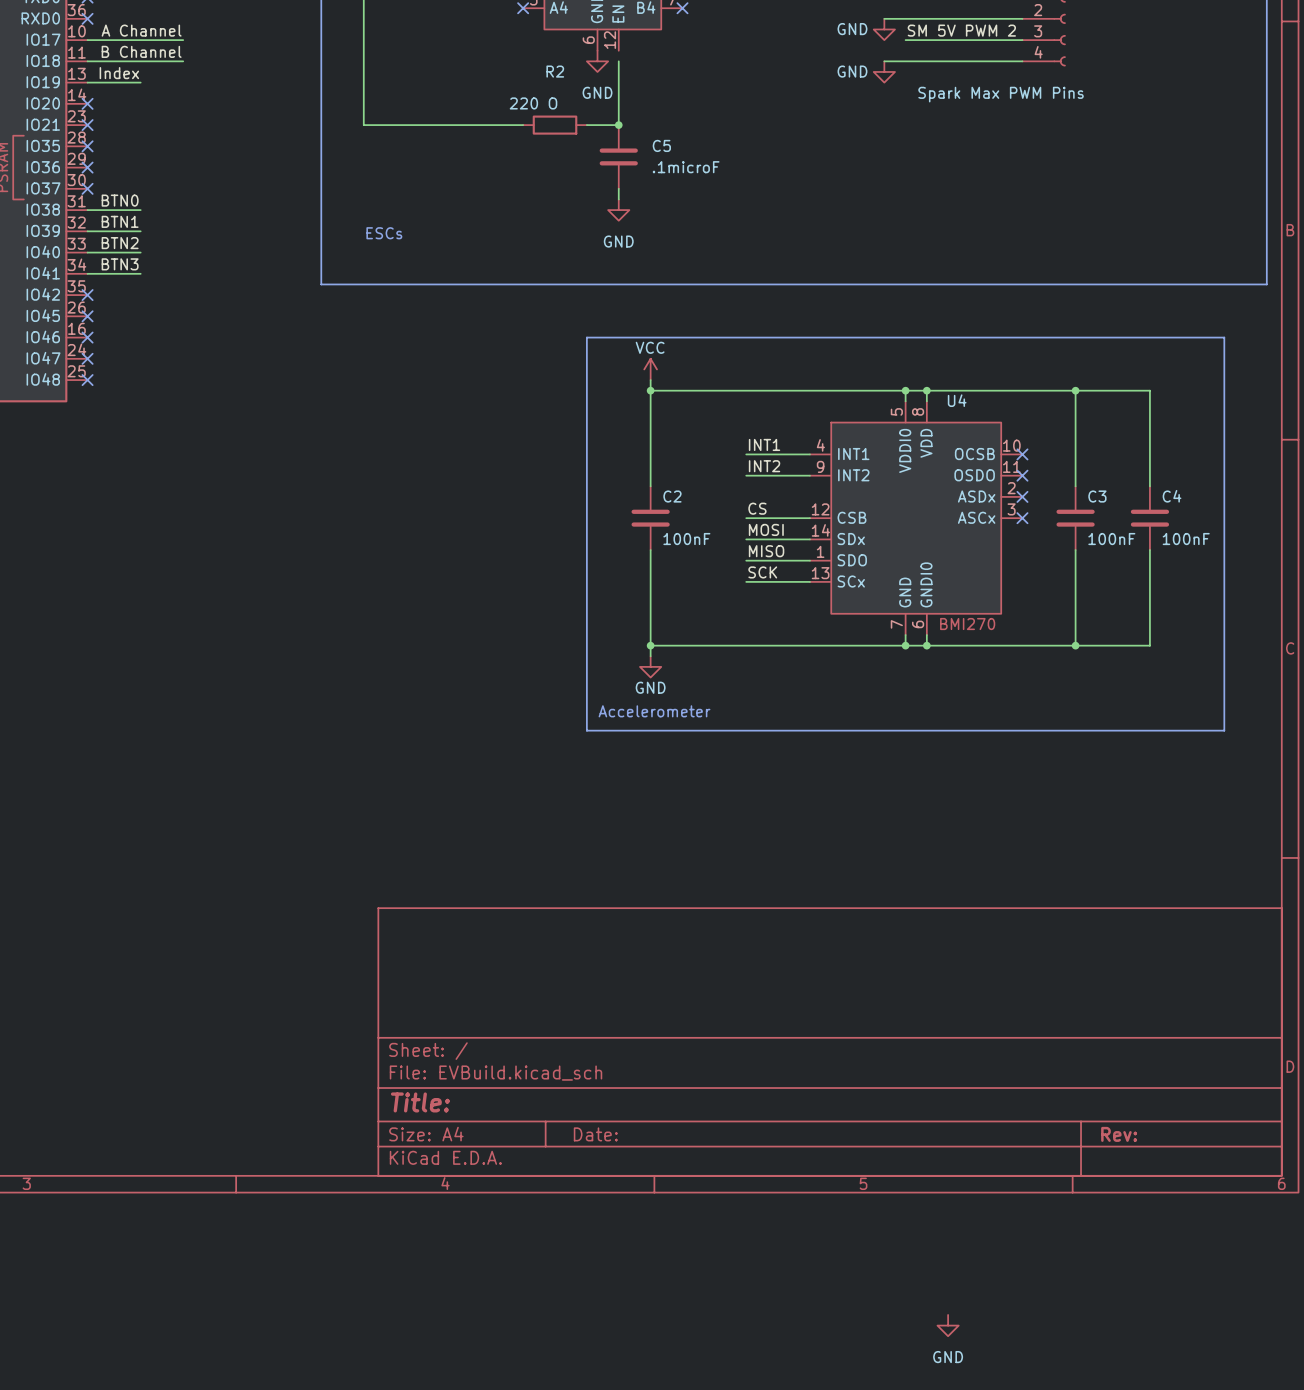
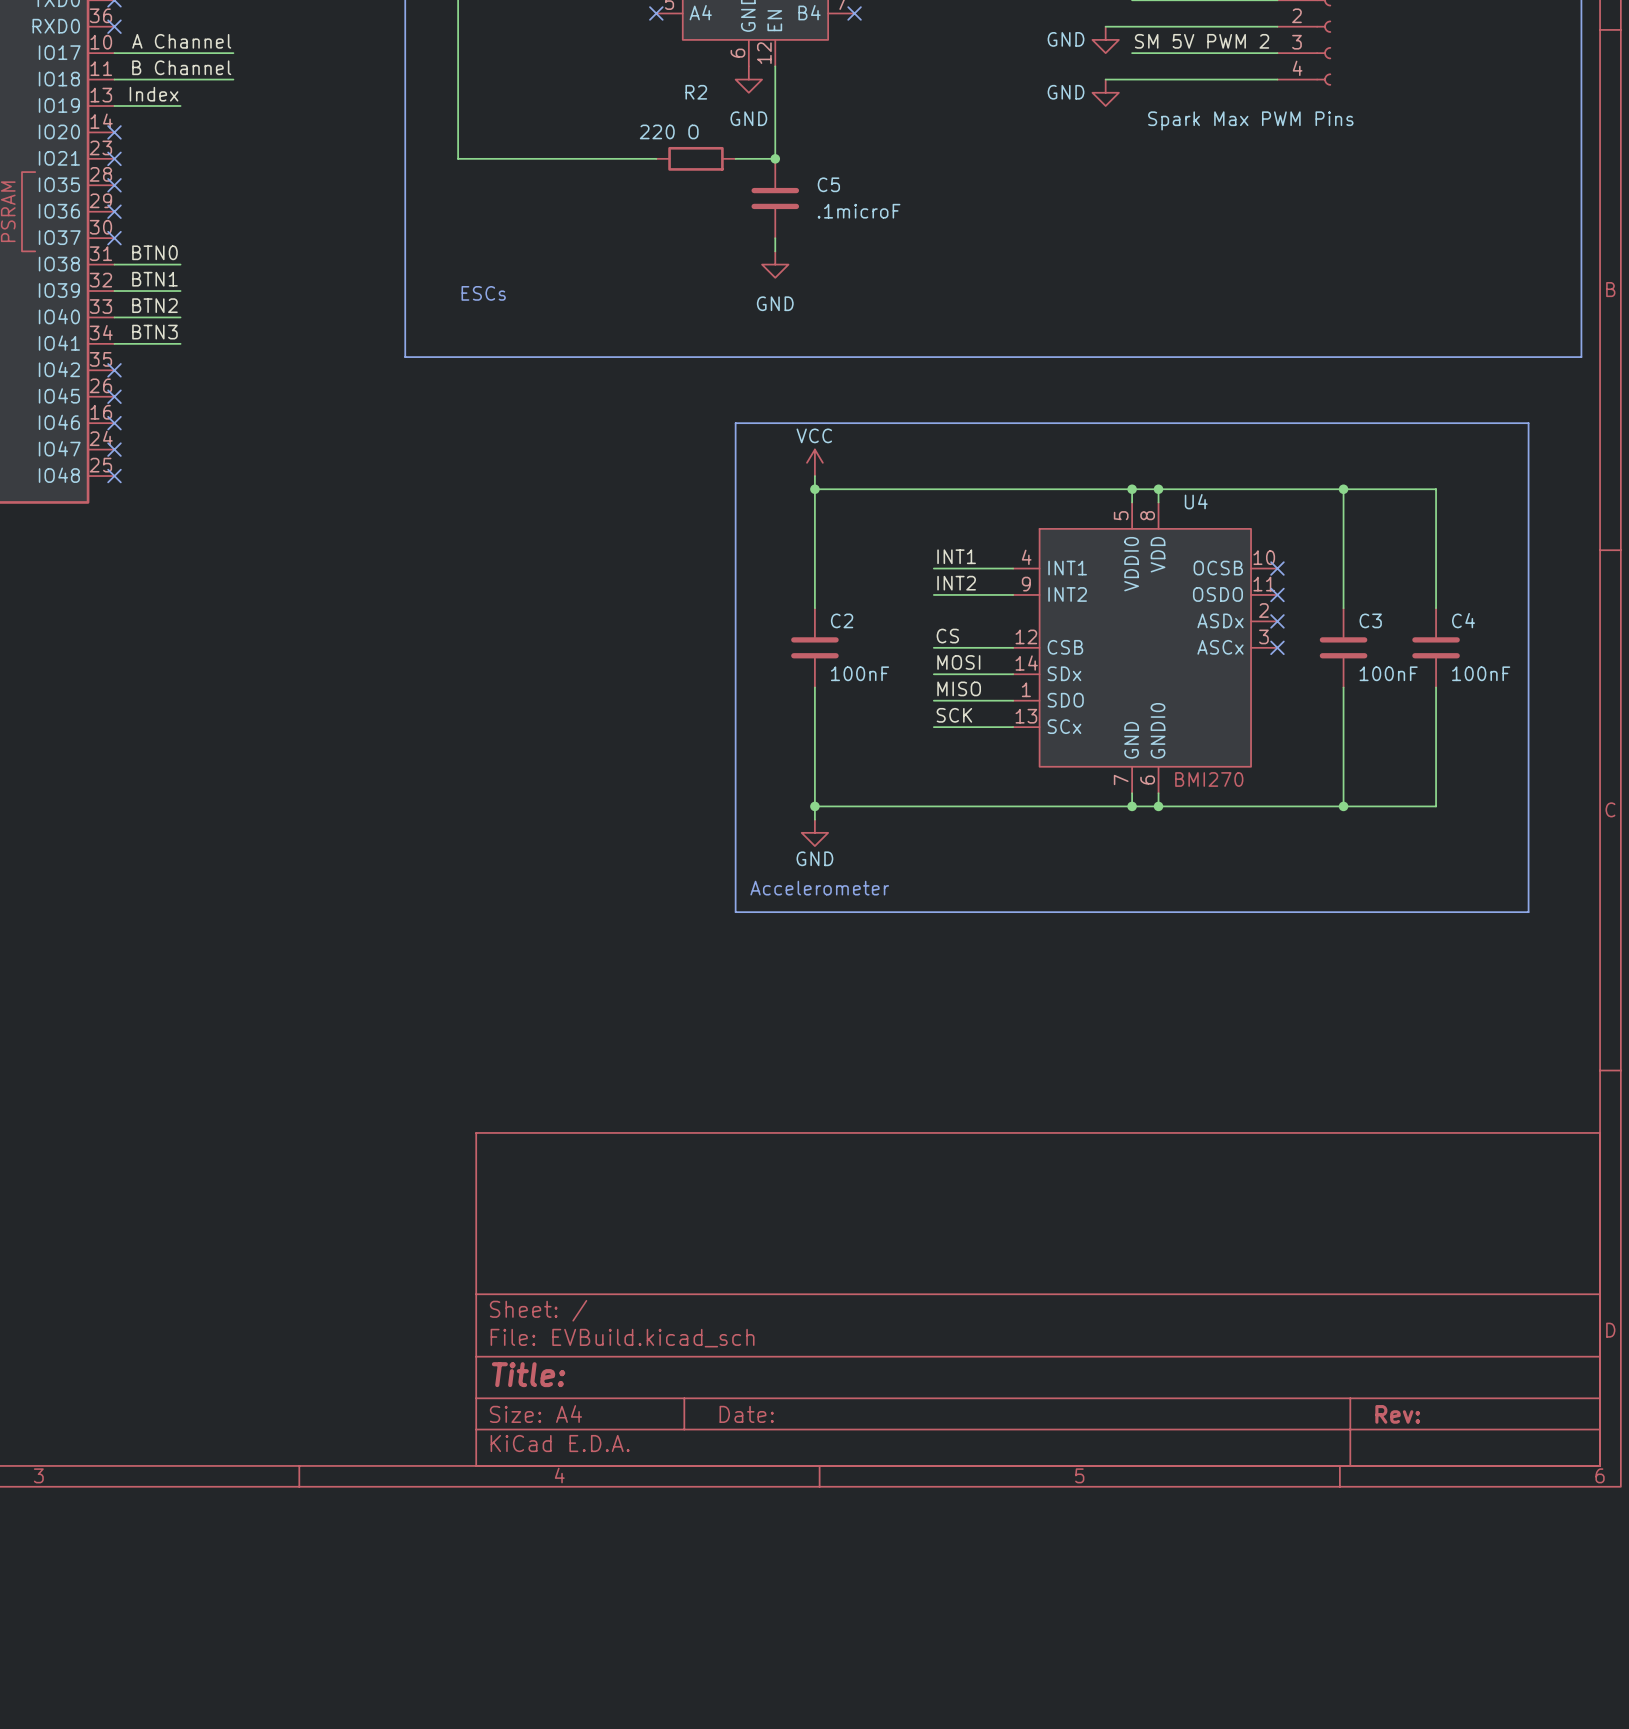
wire: none -> (775, 66) (775, 79)
power symbol: GND (948, 1325) -> none

